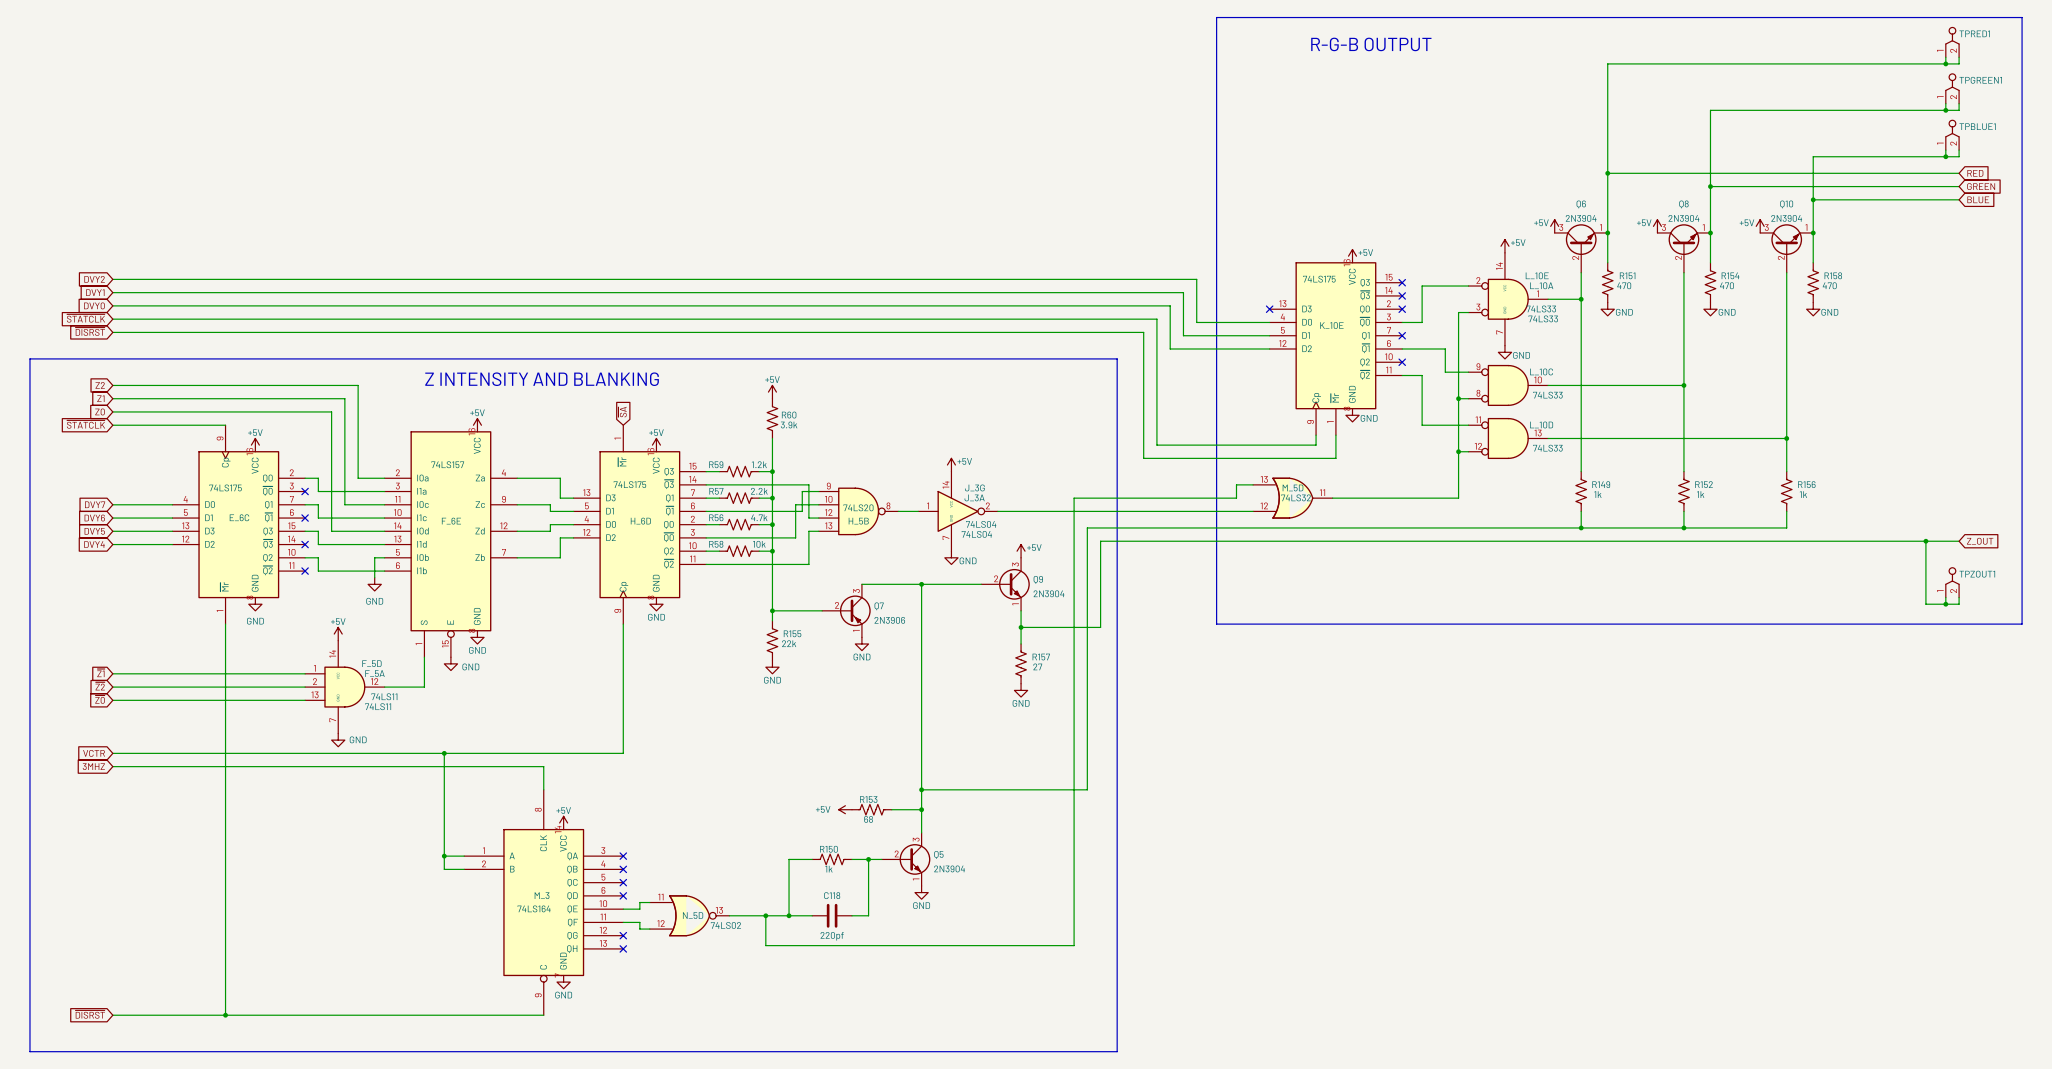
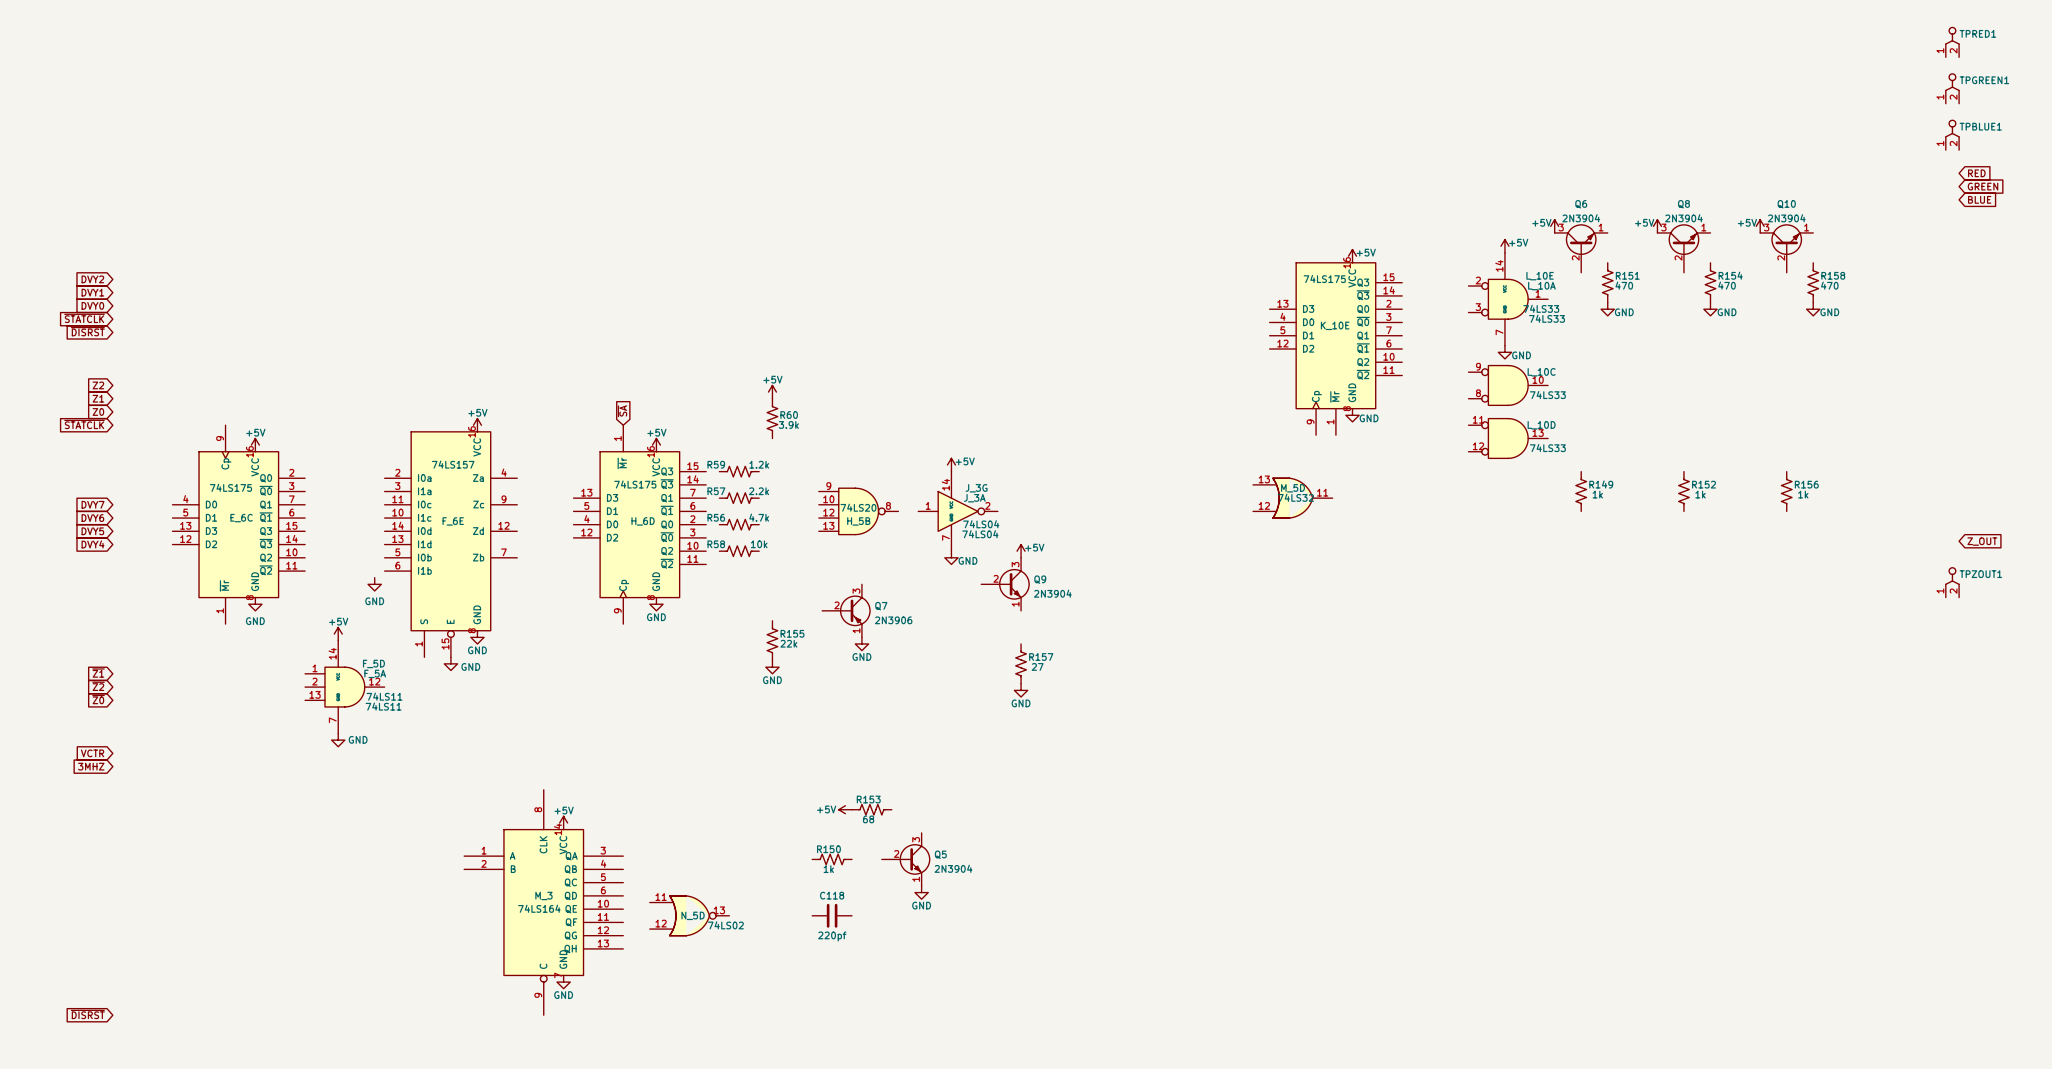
line: (1216, 17) (2022, 17) (2022, 624) (1216, 624) (1216, 17) -> none
text: R-G-B OUTPUT (1371, 44) -> none
wire: (1945, 57) (1945, 63) -> none
wire: (1959, 57) (1959, 63) (1607, 63) (1607, 262) -> none
junction: (1945, 63) -> none
wire: (1945, 103) (1945, 110) -> none
wire: (1959, 103) (1959, 110) (1710, 110) (1710, 262) -> none
junction: (1945, 110) -> none
wire: (1945, 150) (1945, 156) -> none
wire: (1959, 150) (1959, 156) (1813, 156) (1813, 262) -> none
junction: (1945, 156) -> none
wire: (1607, 173) (1959, 173) -> none
junction: (1607, 173) -> none
wire: (1710, 186) (1959, 186) -> none
junction: (1710, 186) -> none
wire: (1813, 199) (1959, 199) -> none
junction: (1813, 199) -> none
junction: (1607, 232) -> none
junction: (1710, 232) -> none
junction: (1813, 232) -> none
wire: (1581, 272) (1581, 471) -> none
wire: (1683, 272) (1683, 471) -> none
wire: (1786, 272) (1786, 471) -> none
wire: (112, 279) (1196, 279) (1196, 322) (1269, 322) -> none
no-connect mark: (1402, 282) -> none
wire: (1468, 286) (1422, 286) (1422, 322) (1402, 322) -> none
wire: (112, 292) (1183, 292) (1183, 335) (1269, 335) -> none
no-connect mark: (1402, 295) -> none
wire: (1548, 299) (1581, 299) -> none
junction: (1581, 299) -> none
wire: (112, 305) (1170, 305) (1170, 348) (1269, 348) -> none
no-connect mark: (1269, 309) -> none
no-connect mark: (1402, 309) -> none
wire: (1468, 312) (1458, 312) (1458, 498) (1332, 498) -> none
wire: (112, 319) (1156, 319) (1156, 445) (1316, 445) (1316, 435) -> none
wire: (112, 332) (1143, 332) (1143, 458) (1335, 458) (1335, 435) -> none
no-connect mark: (1402, 335) -> none
wire: (1402, 348) (1445, 348) (1445, 372) (1468, 372) -> none
line: (29, 358) (29, 1051) (1117, 1051) (1117, 358) (29, 358) -> none
no-connect mark: (1402, 362) -> none
wire: (1402, 375) (1422, 375) (1422, 425) (1468, 425) -> none
text: Z INTENSITY AND BLANKING (542, 379) -> none
wire: (112, 385) (358, 385) (358, 478) (384, 478) -> none
wire: (1548, 385) (1683, 385) -> none
junction: (1683, 385) -> none
wire: (112, 398) (344, 398) (344, 504) (384, 504) -> none
wire: (1458, 398) (1468, 398) -> none
junction: (1458, 398) -> none
wire: (112, 411) (331, 411) (331, 531) (384, 531) -> none
wire: (112, 425) (225, 425) -> none
wire: (772, 438) (772, 620) -> none
wire: (1548, 438) (1786, 438) -> none
junction: (1786, 438) -> none
wire: (1458, 451) (1468, 451) -> none
junction: (1458, 451) -> none
wire: (706, 471) (719, 471) -> none
wire: (759, 471) (772, 471) -> none
junction: (772, 471) -> none
wire: (305, 478) (318, 478) (318, 491) (384, 491) -> none
wire: (517, 478) (560, 478) (560, 498) (573, 498) -> none
wire: (706, 484) (808, 484) (808, 518) (818, 518) -> none
wire: (1253, 484) (1236, 484) (1236, 498) (1074, 498) (1074, 945) (765, 945) (765, 915) -> none
no-connect mark: (305, 491) -> none
wire: (818, 491) (802, 491) (802, 511) (706, 511) -> none
wire: (706, 498) (719, 498) -> none
wire: (759, 498) (772, 498) -> none
junction: (772, 498) -> none
wire: (112, 504) (172, 504) -> none
wire: (305, 504) (318, 504) (318, 518) (384, 518) -> none
wire: (517, 504) (550, 504) (550, 511) (573, 511) -> none
wire: (818, 504) (795, 504) (795, 537) (706, 537) -> none
wire: (898, 511) (918, 511) -> none
wire: (997, 511) (1253, 511) -> none
wire: (1581, 511) (1581, 527) -> none
wire: (1683, 511) (1683, 527) -> none
wire: (1786, 511) (1786, 527) (1087, 527) (1087, 789) (921, 789) -> none
wire: (112, 518) (172, 518) -> none
no-connect mark: (305, 518) -> none
wire: (573, 524) (550, 524) (550, 531) (517, 531) -> none
wire: (706, 524) (719, 524) -> none
wire: (759, 524) (772, 524) -> none
junction: (772, 524) -> none
junction: (1581, 527) -> none
junction: (1683, 527) -> none
wire: (112, 531) (172, 531) -> none
wire: (305, 531) (318, 531) (318, 544) (384, 544) -> none
wire: (818, 531) (808, 531) (808, 564) (706, 564) -> none
wire: (573, 537) (560, 537) (560, 557) (517, 557) -> none
wire: (1925, 541) (1925, 604) (1959, 604) (1959, 597) -> none
junction: (1925, 541) -> none
wire: (1959, 541) (1100, 541) (1100, 627) (1021, 627) -> none
wire: (112, 544) (172, 544) -> none
no-connect mark: (305, 544) -> none
wire: (706, 551) (719, 551) -> none
wire: (759, 551) (772, 551) -> none
junction: (772, 551) -> none
wire: (305, 557) (318, 557) (318, 571) (384, 571) -> none
wire: (384, 557) (374, 557) (374, 577) -> none
no-connect mark: (305, 571) -> none
wire: (861, 584) (981, 584) -> none
wire: (921, 584) (921, 832) -> none
junction: (921, 584) -> none
wire: (1945, 597) (1945, 604) -> none
junction: (1945, 604) -> none
wire: (772, 610) (822, 610) -> none
junction: (772, 610) -> none
wire: (1021, 610) (1021, 643) -> none
wire: (225, 624) (225, 1015) -> none
wire: (623, 624) (623, 753) (112, 753) -> none
junction: (1021, 627) -> none
wire: (424, 657) (424, 687) (384, 687) -> none
wire: (112, 673) (305, 673) -> none
wire: (112, 687) (305, 687) -> none
wire: (112, 700) (305, 700) -> none
wire: (444, 753) (444, 869) (464, 869) -> none
junction: (444, 753) -> none
wire: (112, 766) (543, 766) (543, 789) -> none
junction: (921, 789) -> none
wire: (891, 809) (921, 809) -> none
junction: (921, 809) -> none
wire: (444, 856) (464, 856) -> none
junction: (444, 856) -> none
no-connect mark: (623, 856) -> none
wire: (812, 859) (789, 859) (789, 915) -> none
wire: (852, 859) (881, 859) -> none
wire: (868, 859) (868, 915) (852, 915) -> none
junction: (868, 859) -> none
no-connect mark: (623, 869) -> none
no-connect mark: (623, 882) -> none
no-connect mark: (623, 895) -> none
wire: (649, 902) (639, 902) (639, 909) (623, 909) -> none
wire: (729, 915) (812, 915) -> none
junction: (765, 915) -> none
junction: (789, 915) -> none
wire: (623, 922) (639, 922) (639, 929) (649, 929) -> none
no-connect mark: (623, 935) -> none
no-connect mark: (623, 948) -> none
wire: (112, 1015) (543, 1015) -> none
junction: (225, 1015) -> none

